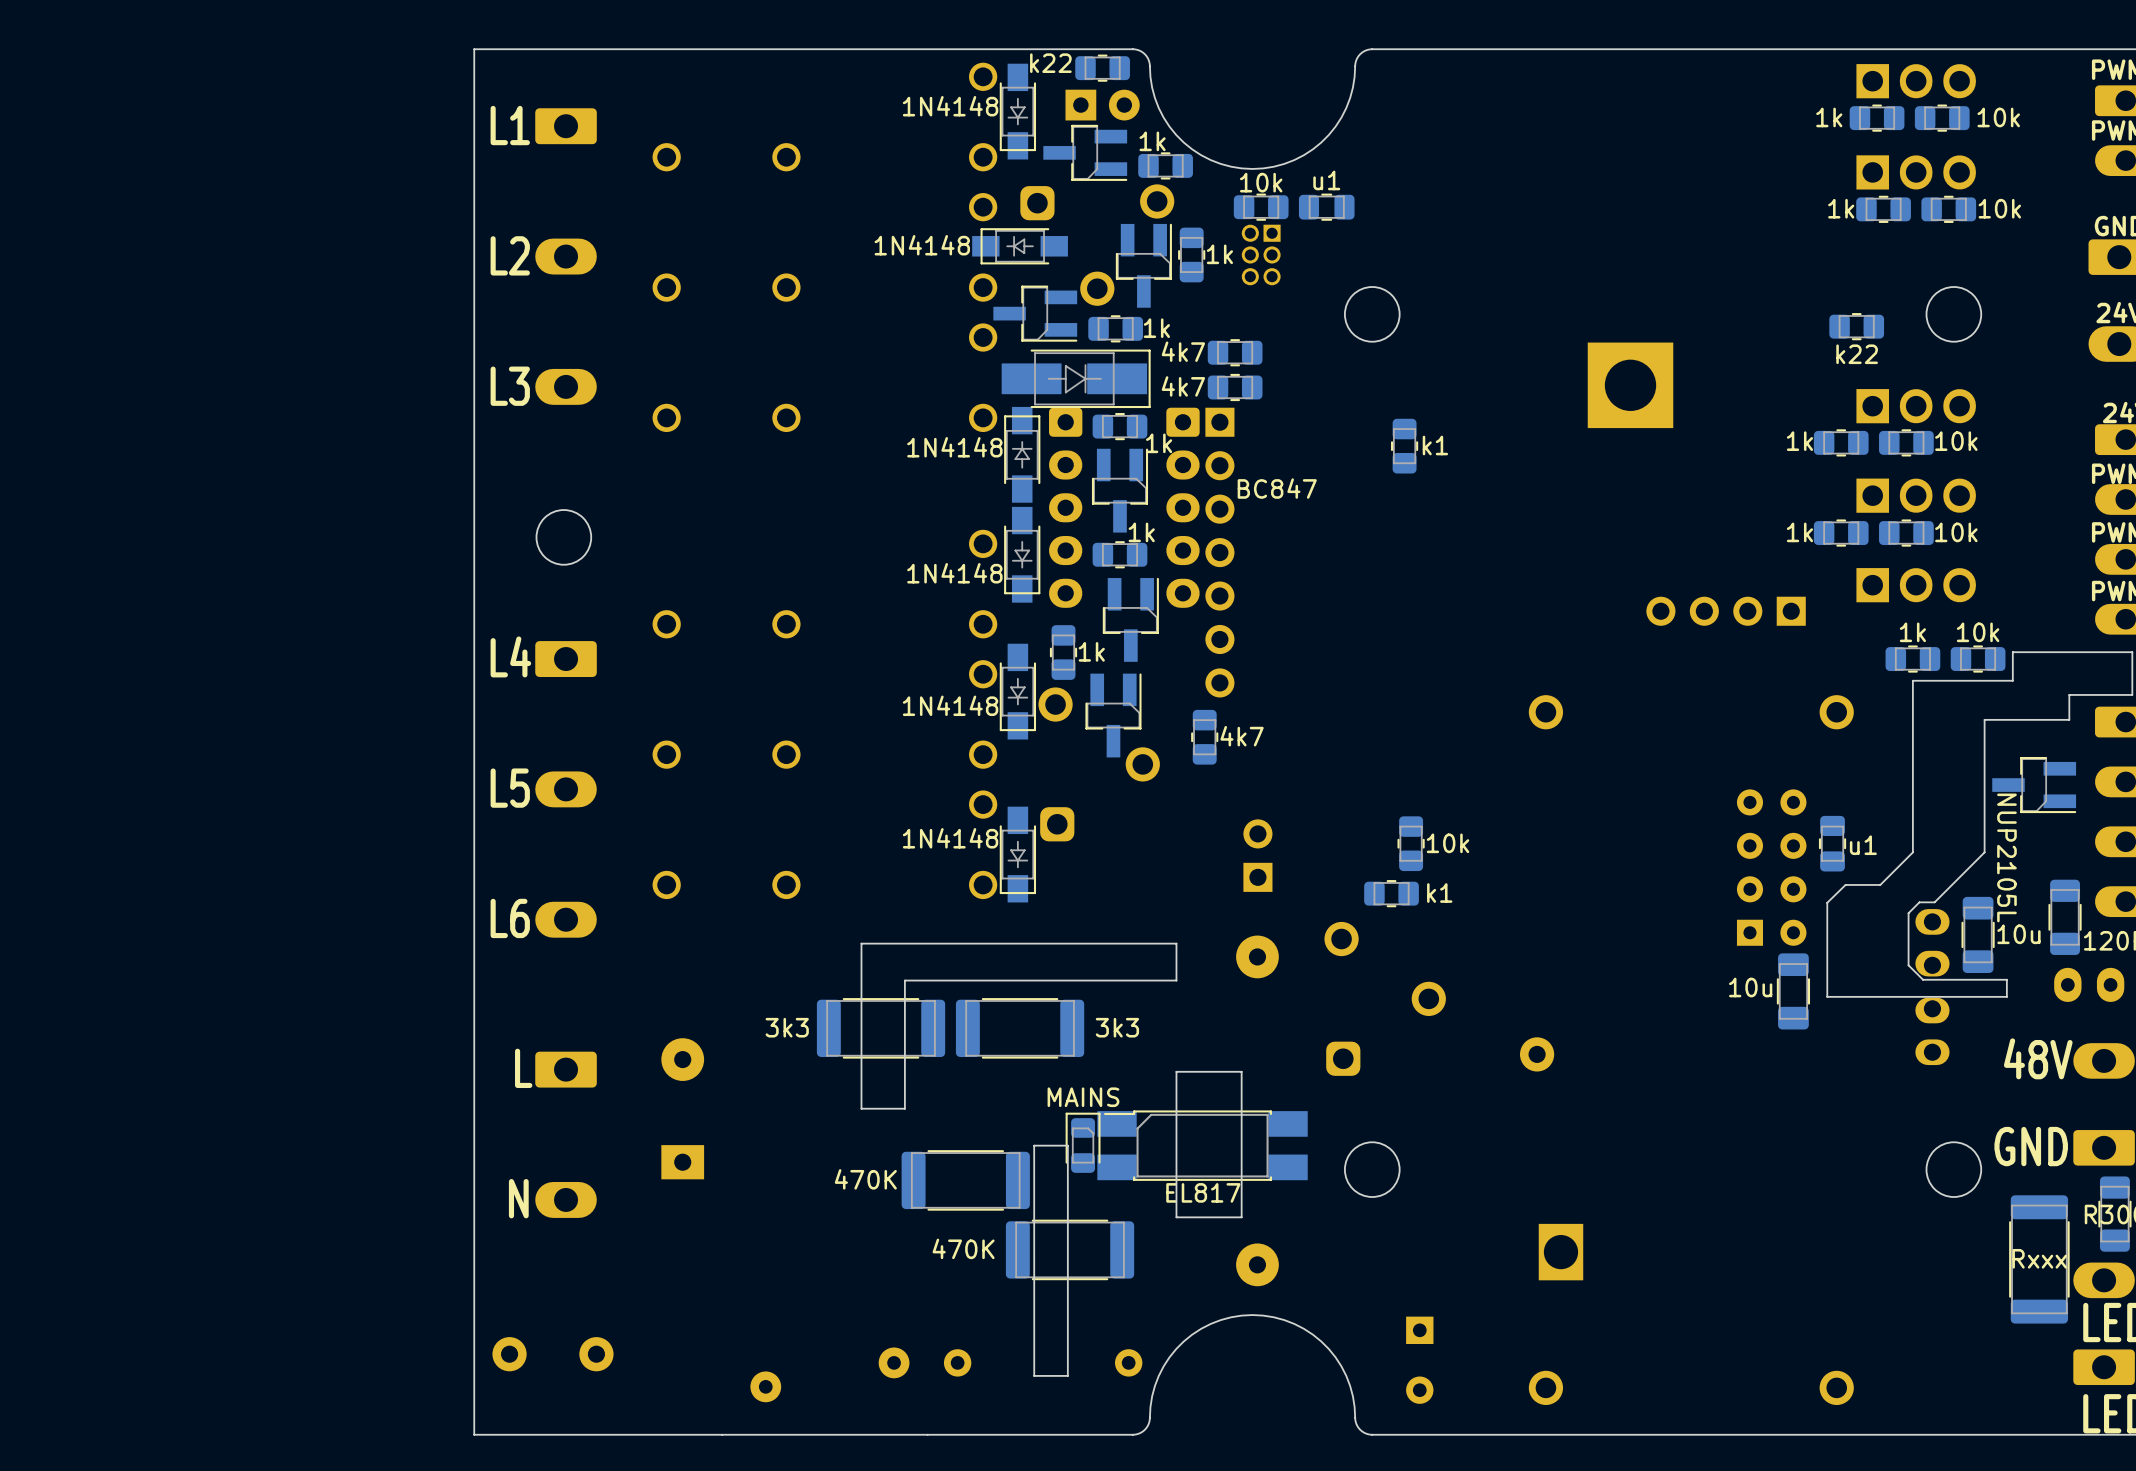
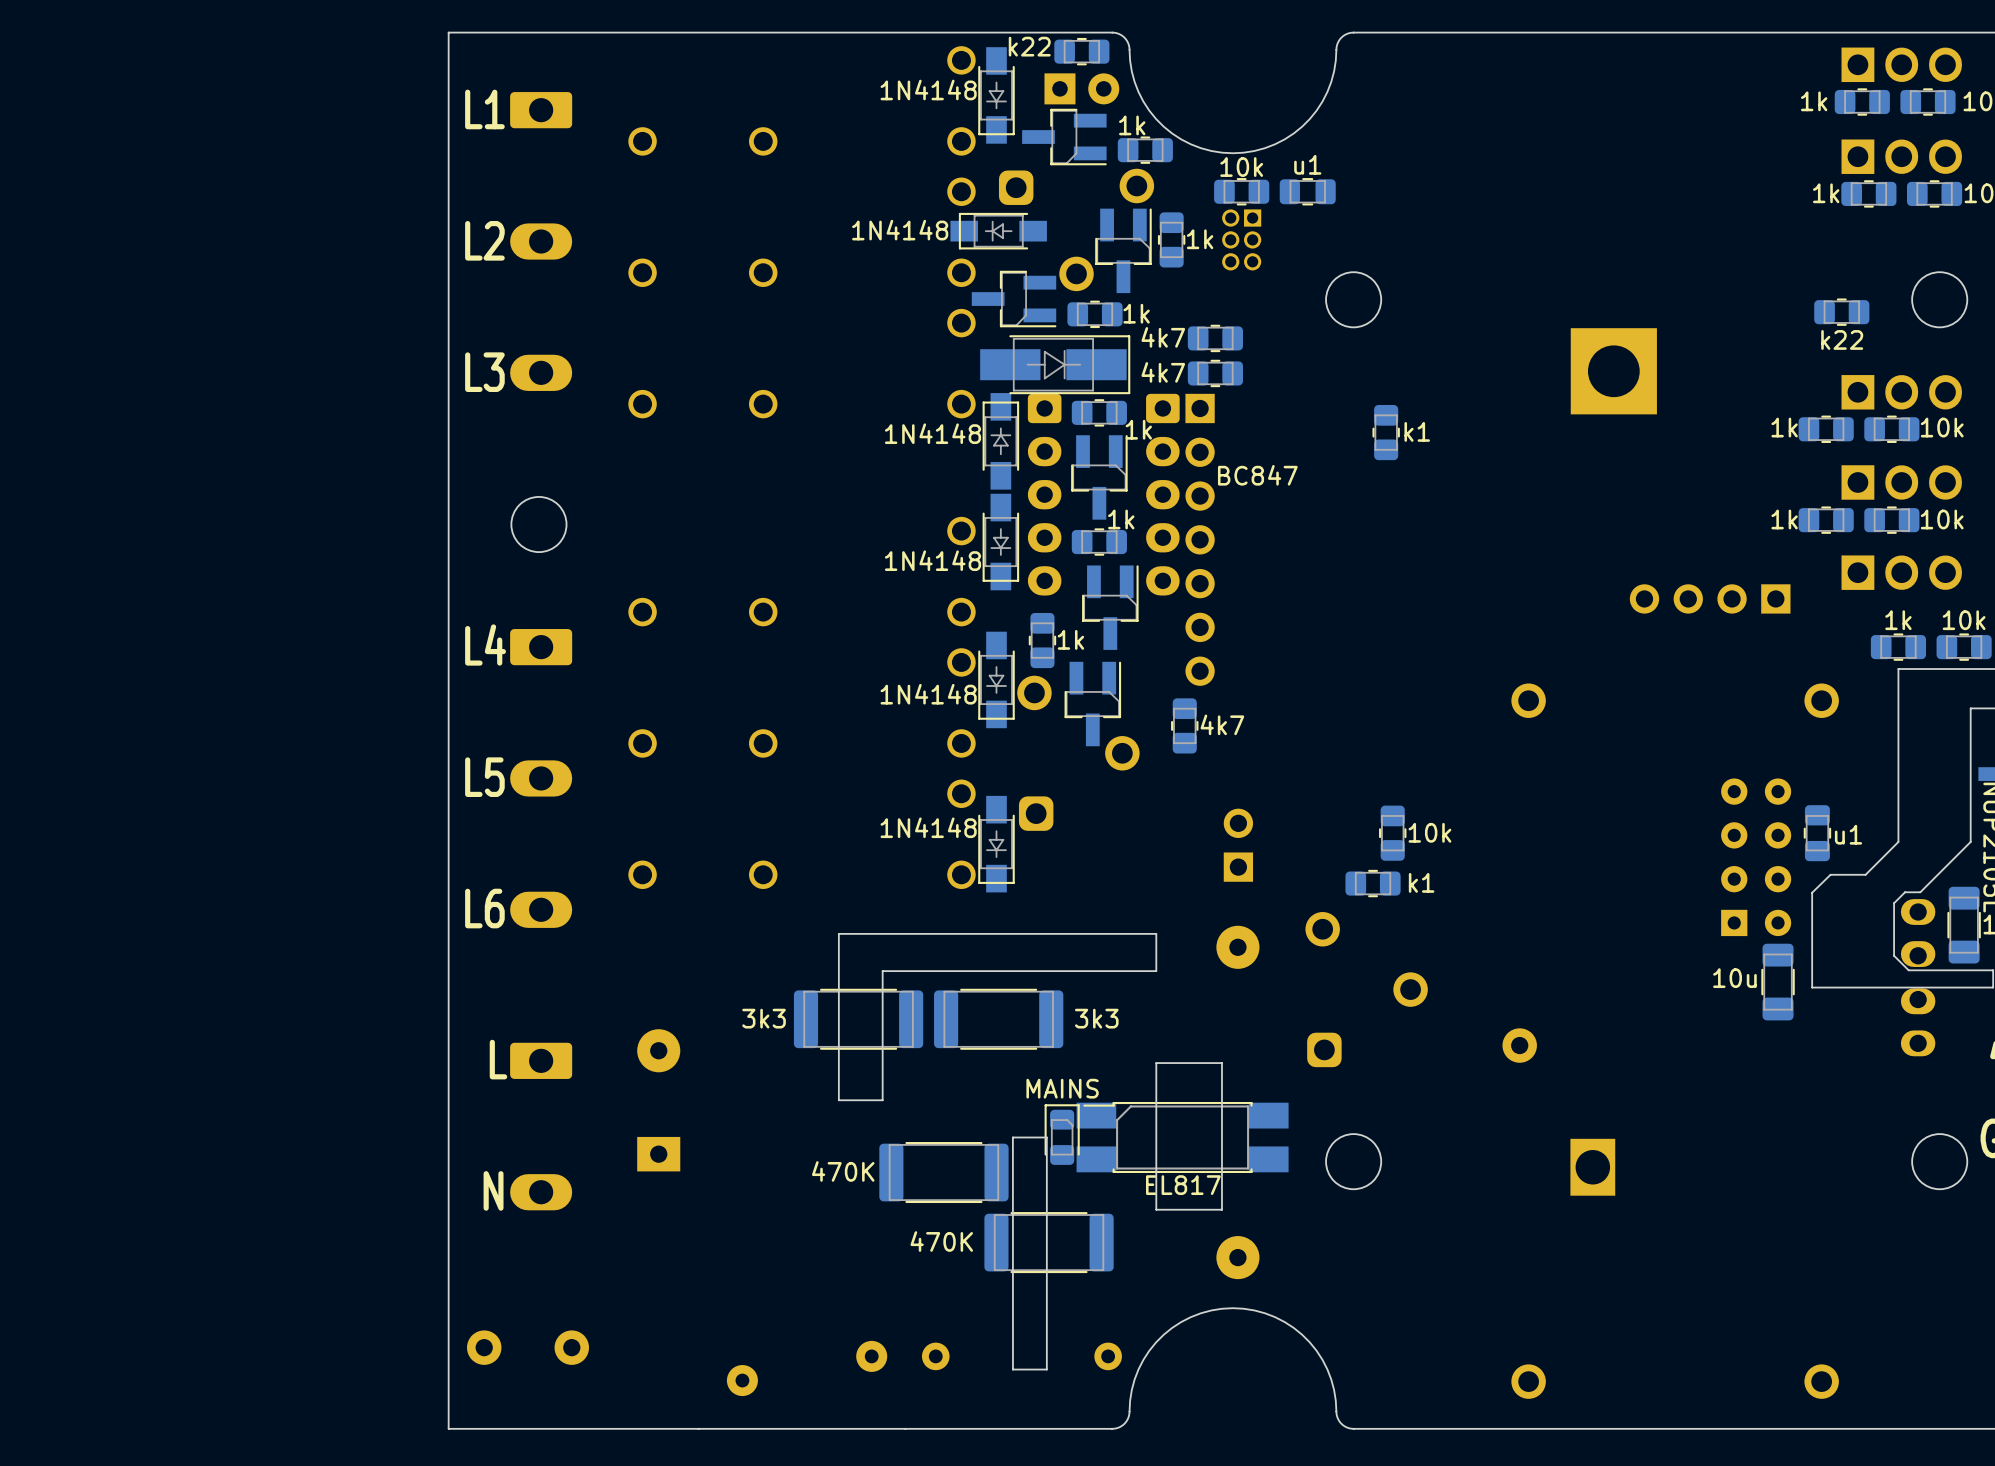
part position: (1560, 1252) -> (1592, 1167)
part: (1419, 1360) -> none

